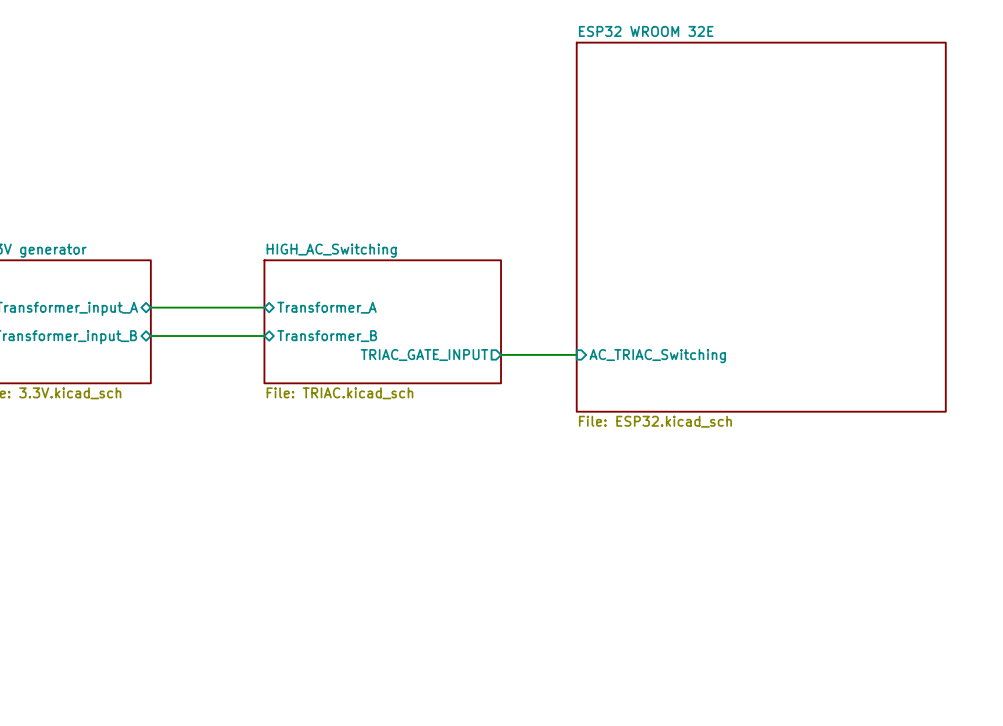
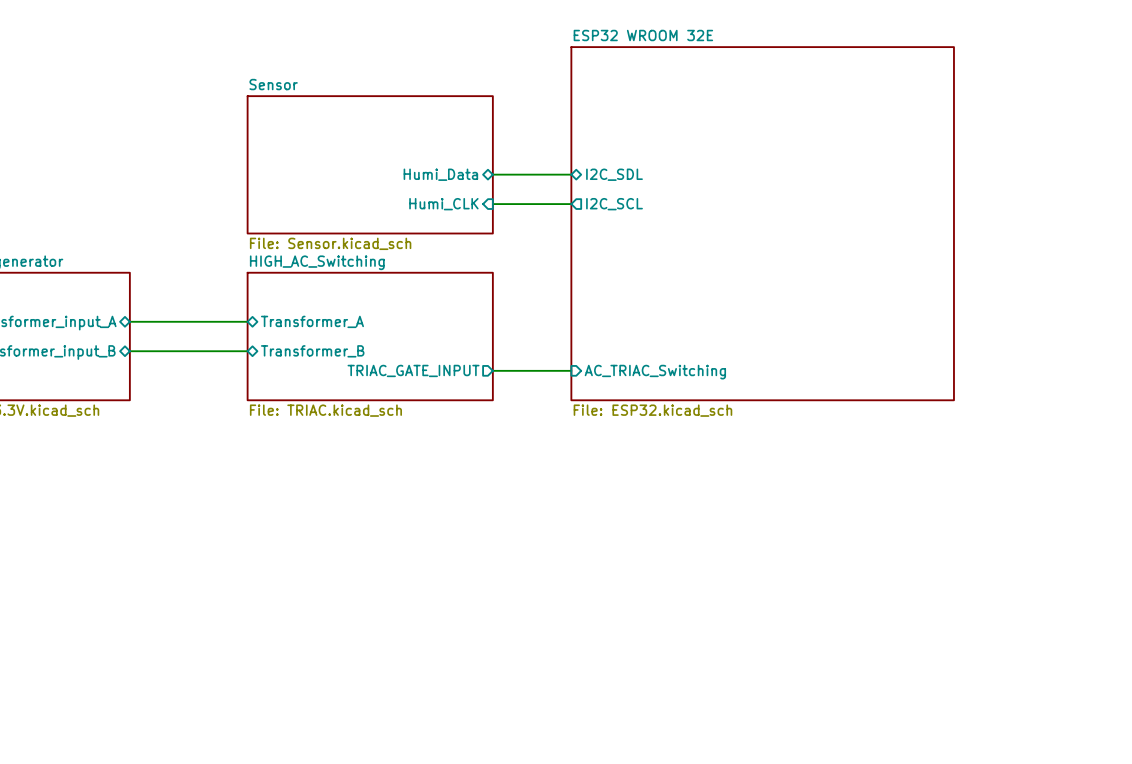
sheet ESP32 WROOM 32E shape: [576, 42, 947, 413] -> [570, 46, 955, 401]
sheet Sensor: none -> File: Sensor.kicad_sch (370, 164)
sheet pin: none -> Humi_Data (440, 174)
wire: none -> (492, 174) (571, 174)
sheet pin: none -> I2C_SDL (614, 174)
sheet pin: none -> Humi_CLK (443, 204)
wire: none -> (492, 204) (571, 204)
sheet pin: none -> I2C_SCL (614, 204)

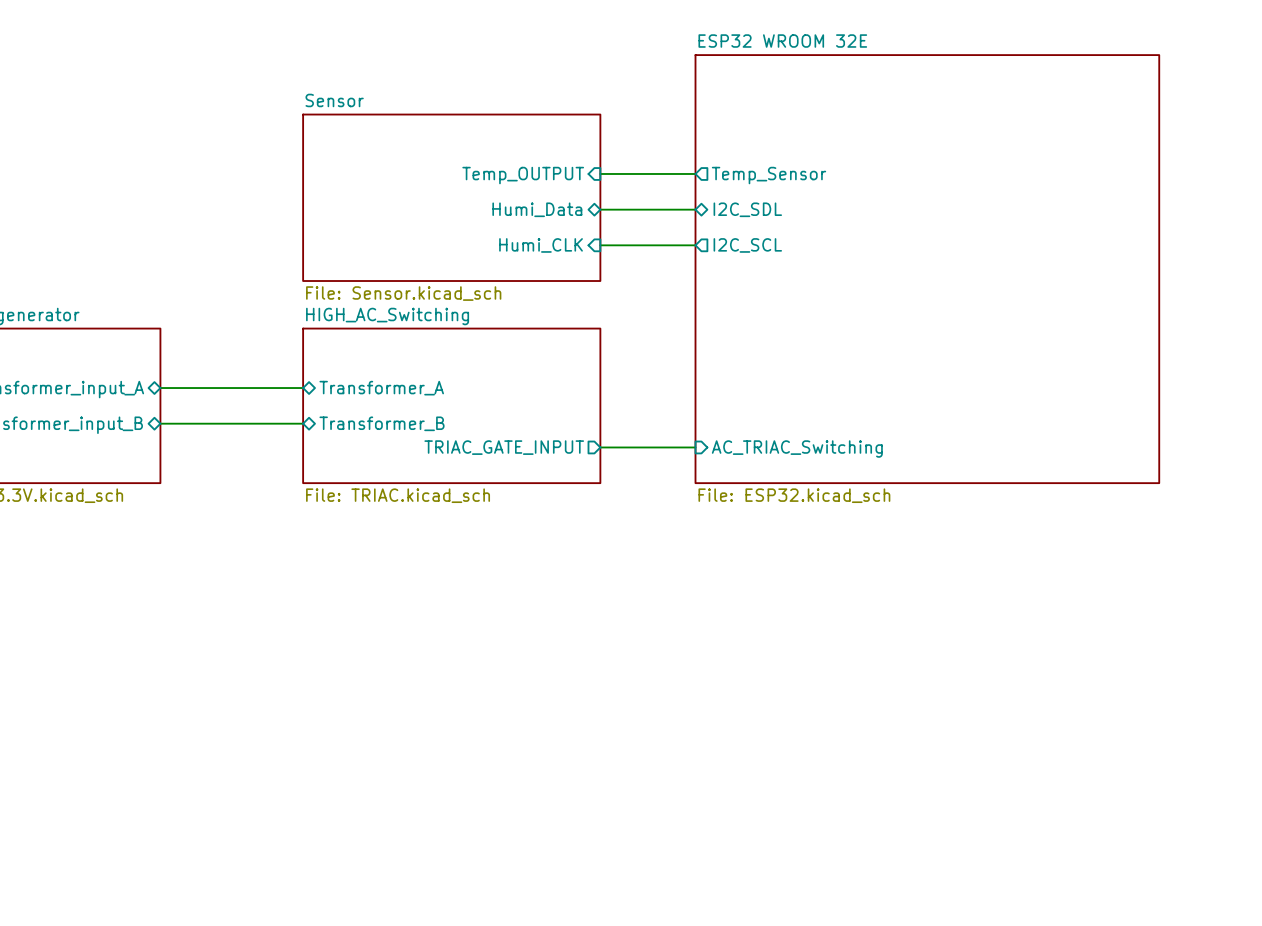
wire: none -> (600, 173) (695, 173)
sheet pin: none -> Temp_OUTPUT (523, 175)
sheet pin: none -> Temp_Sensor (769, 175)

